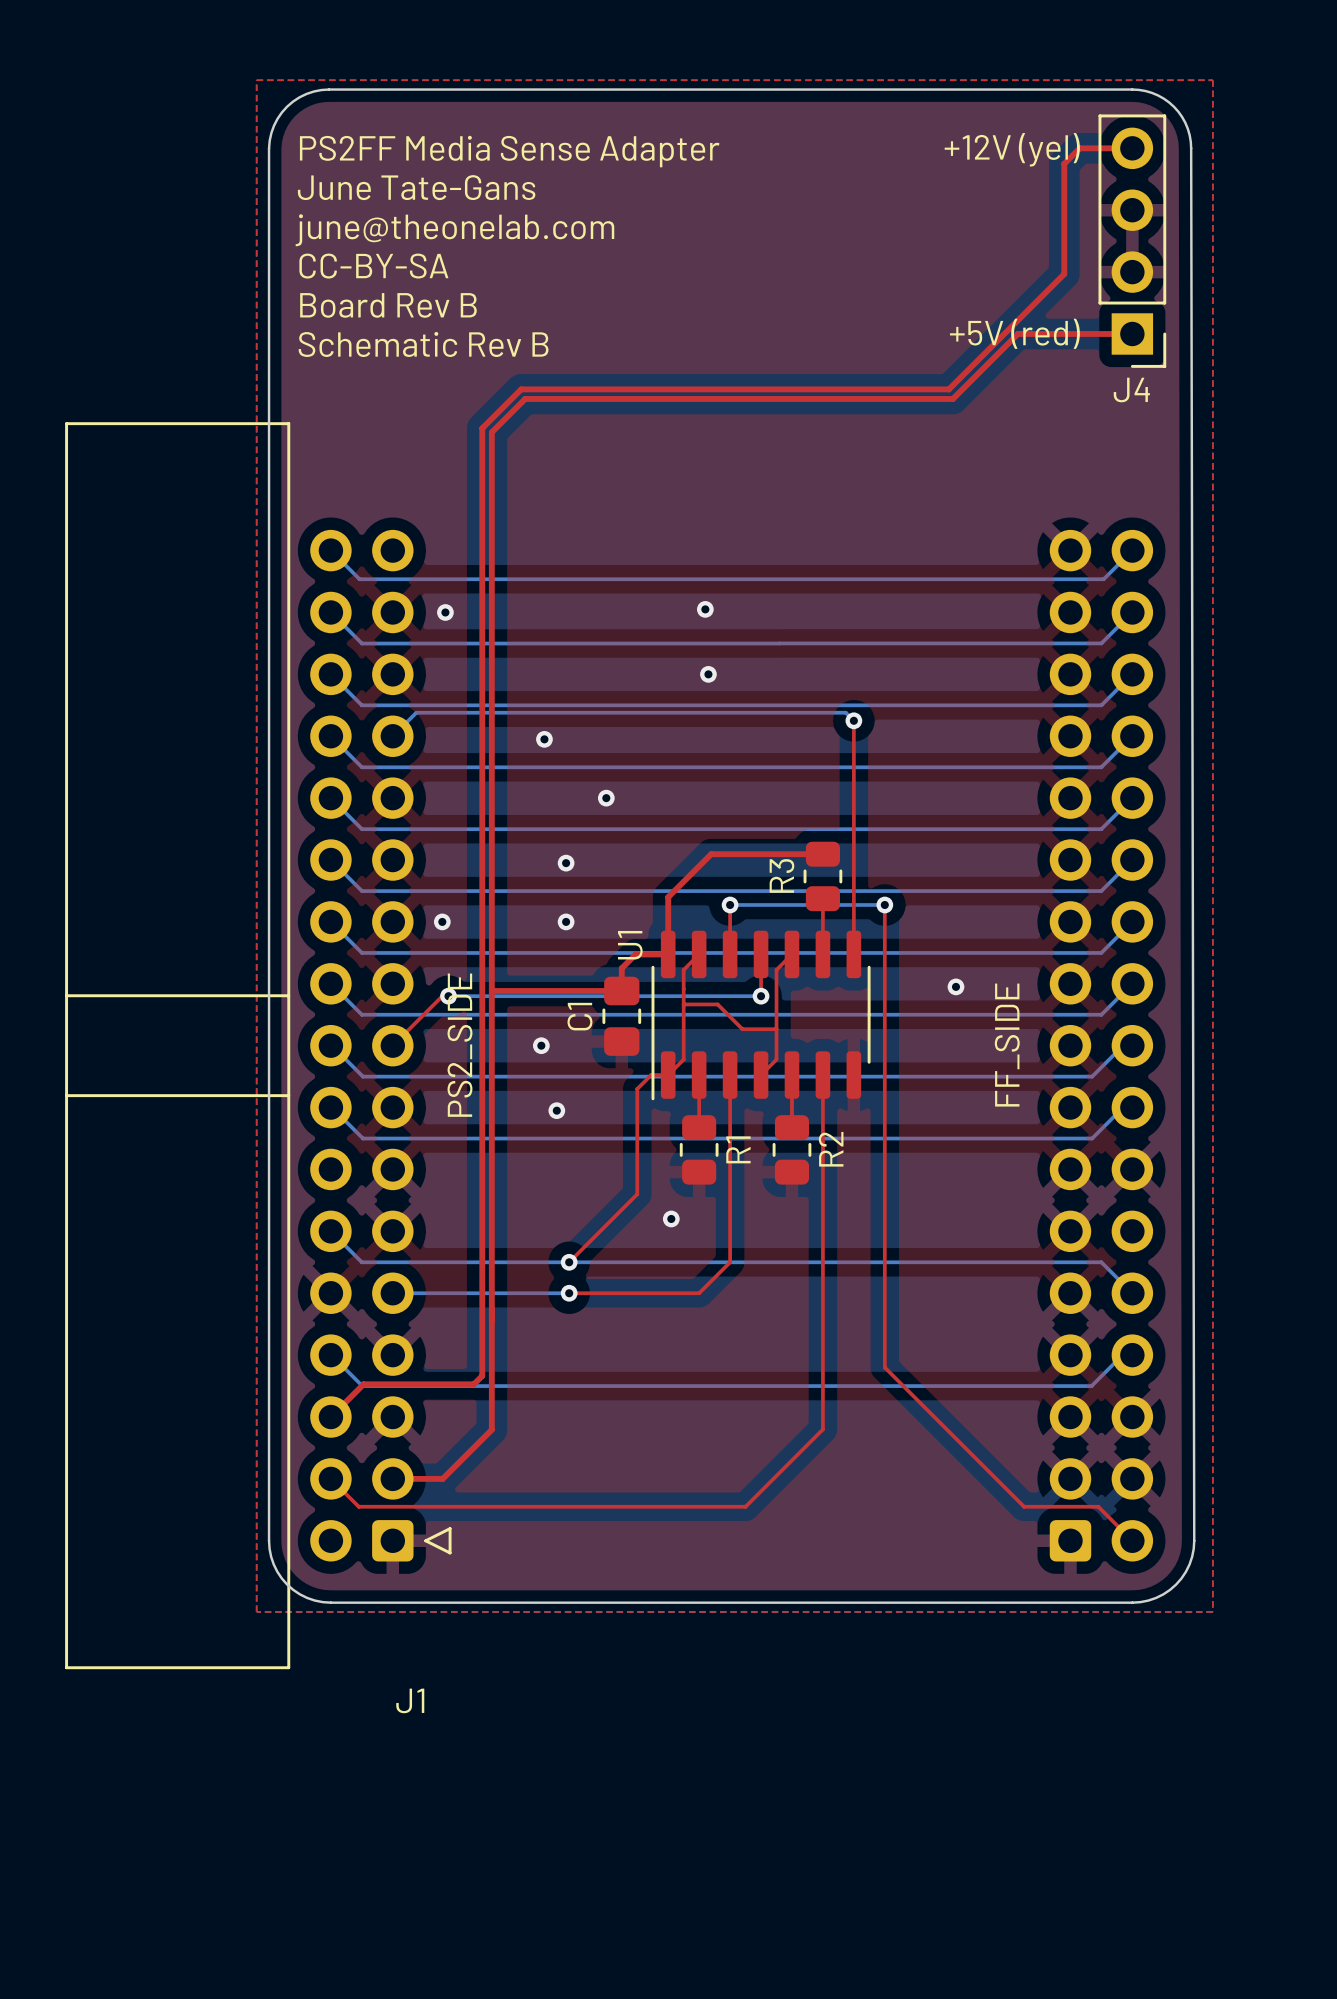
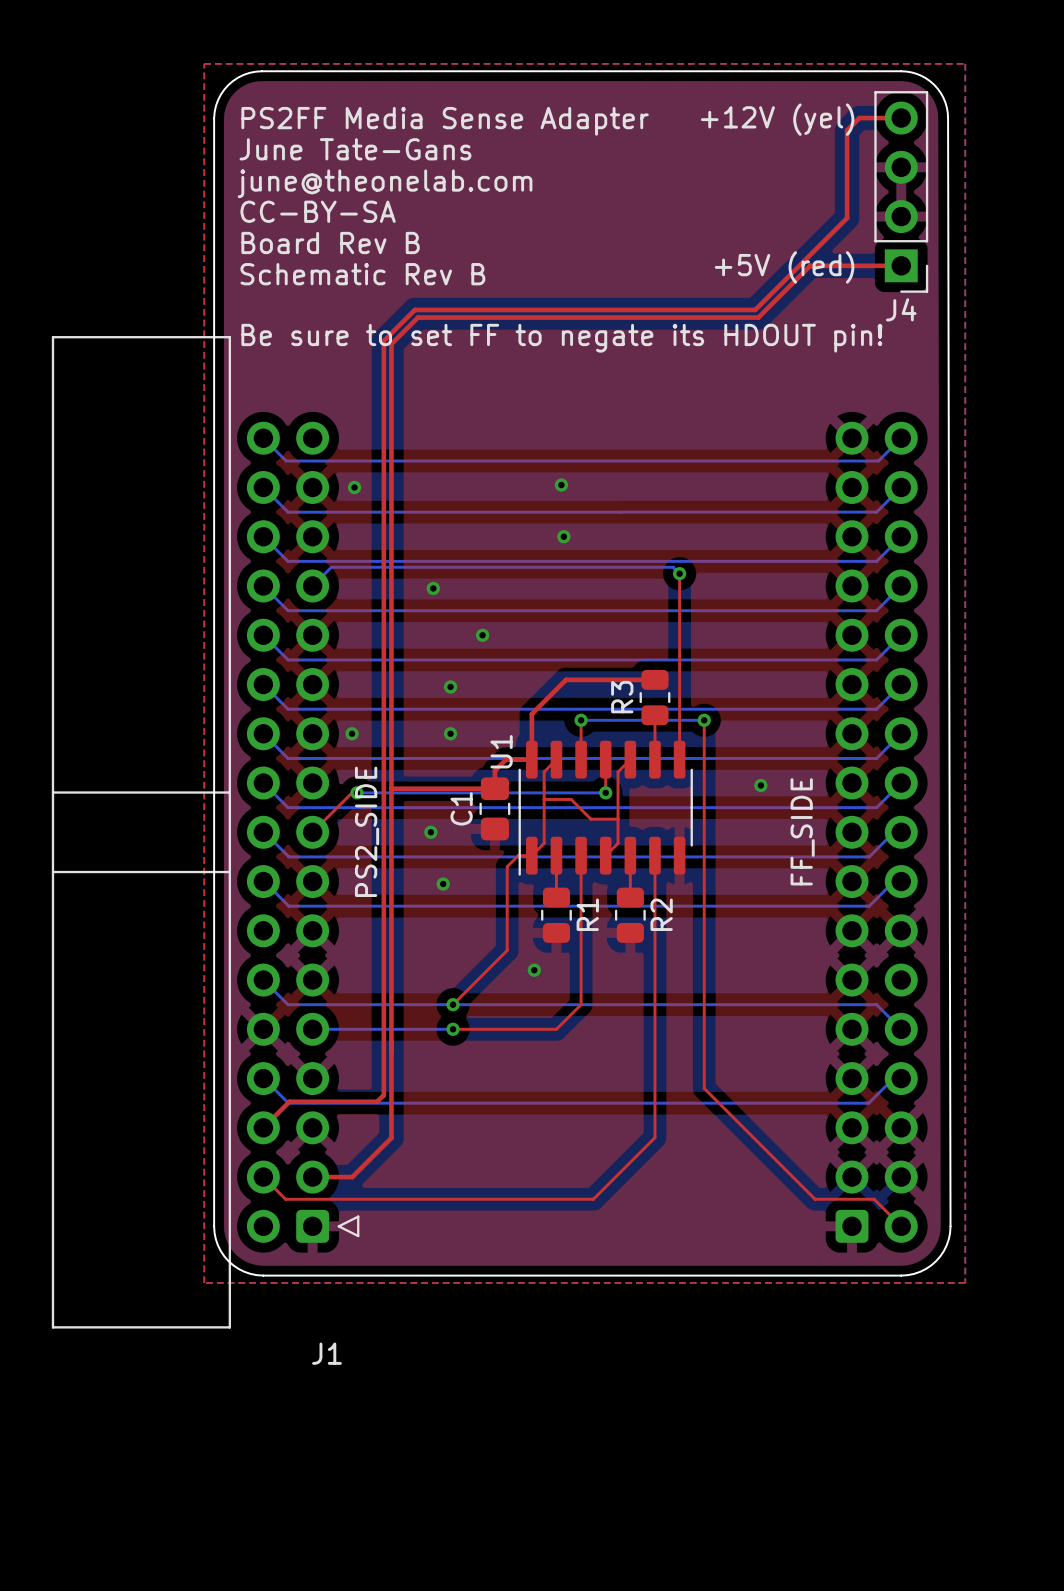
text: none -> Be sure to set FF to negate its HDOUT pin! (561, 338)

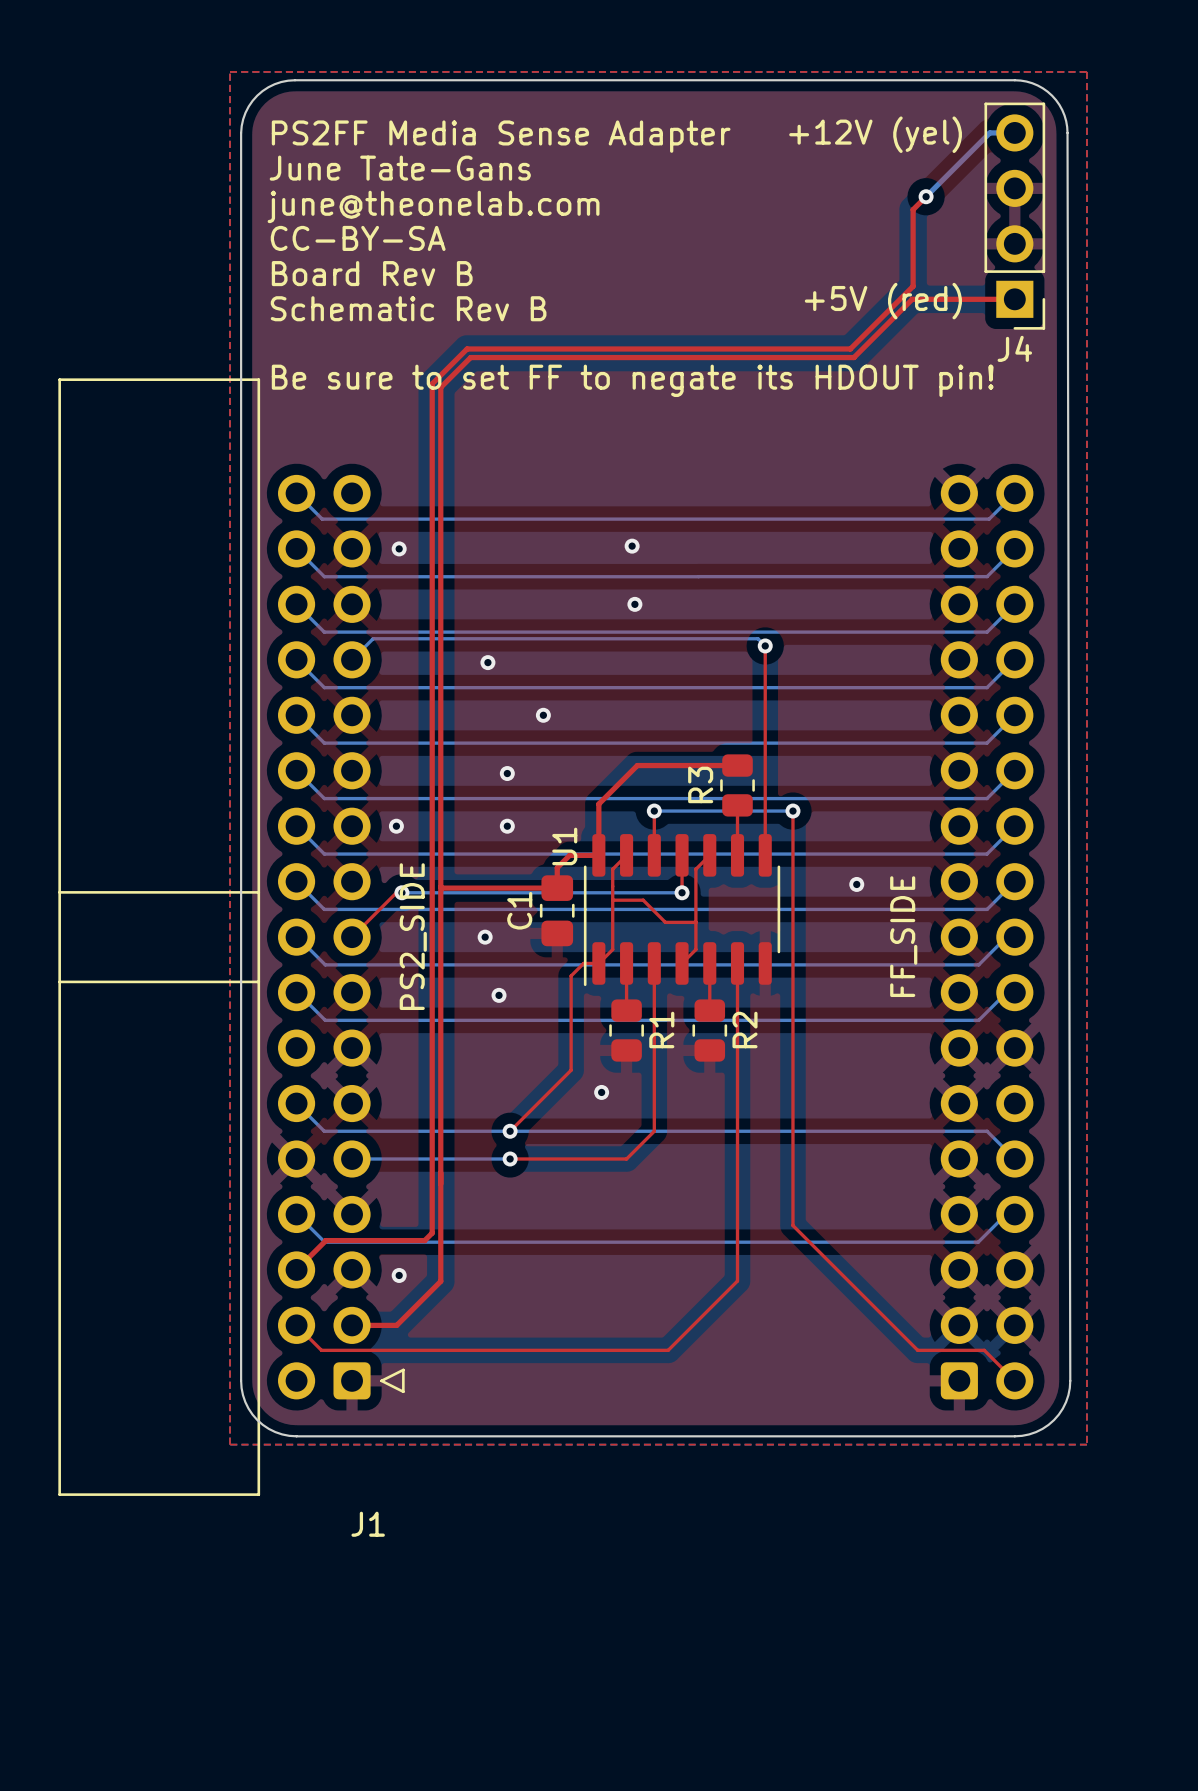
top track: (901, 118) (859, 118) (847, 130) (847, 218) (810, 254) -> (926, 196) (913, 209) (913, 286)
bottom track: none -> (1014, 132) (989, 132) (926, 196)
via: none -> (926, 196)
via: none -> (399, 1275)

